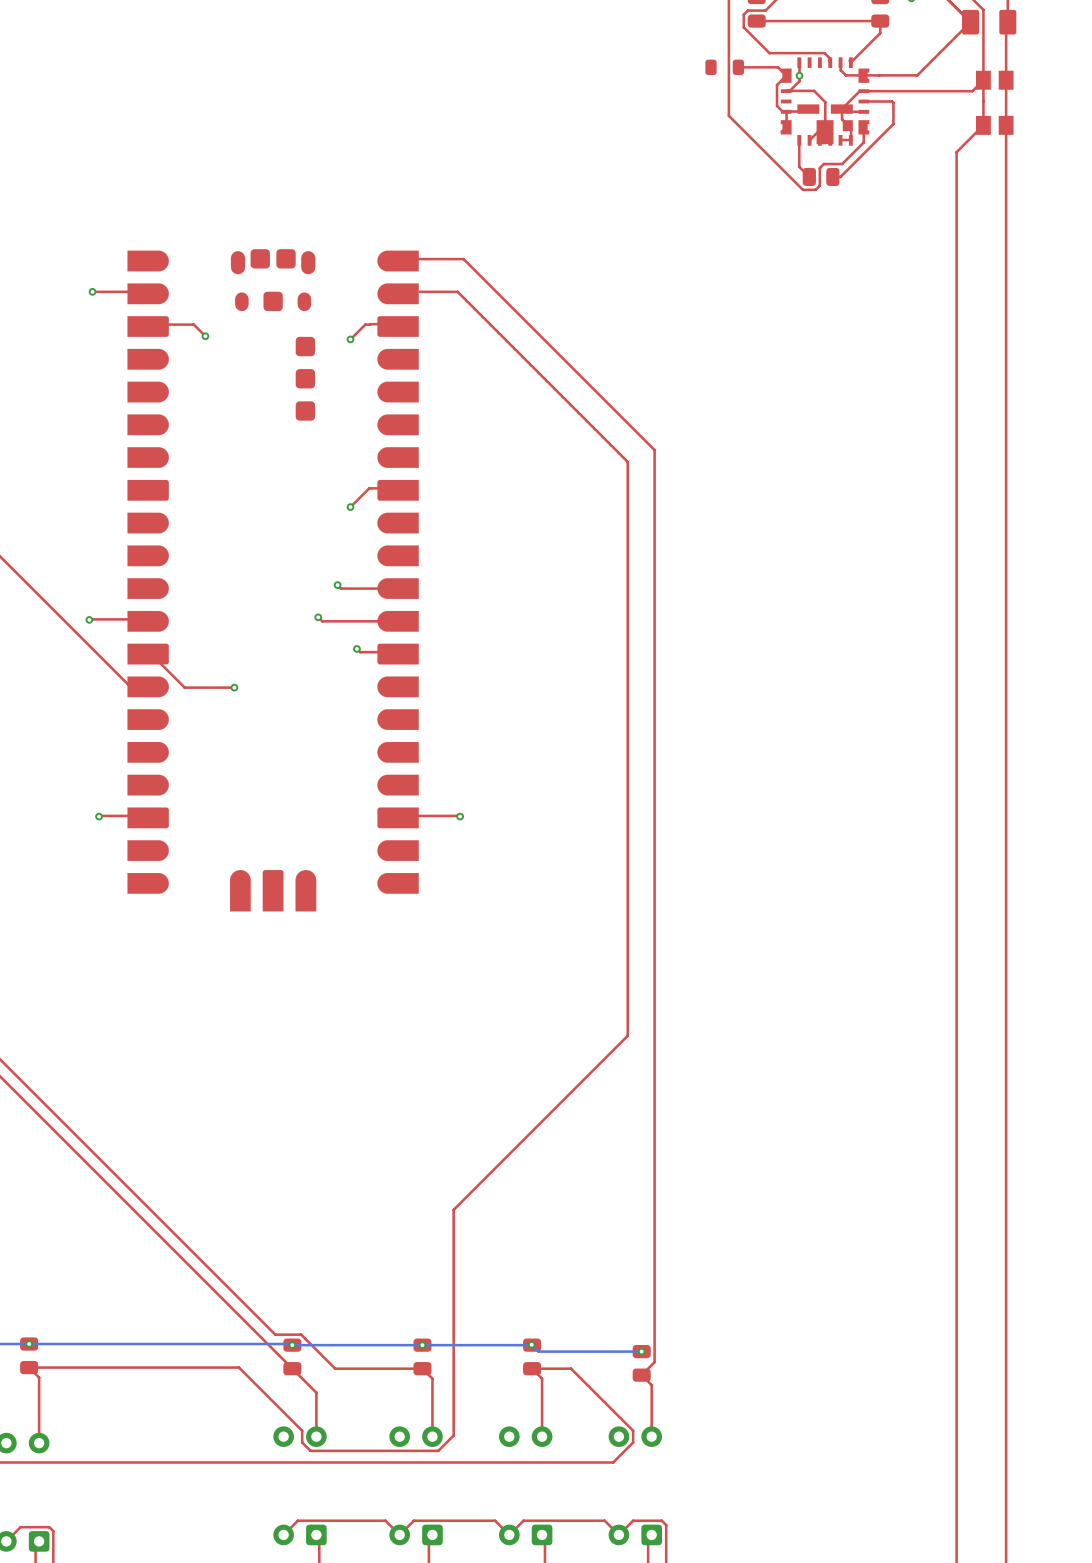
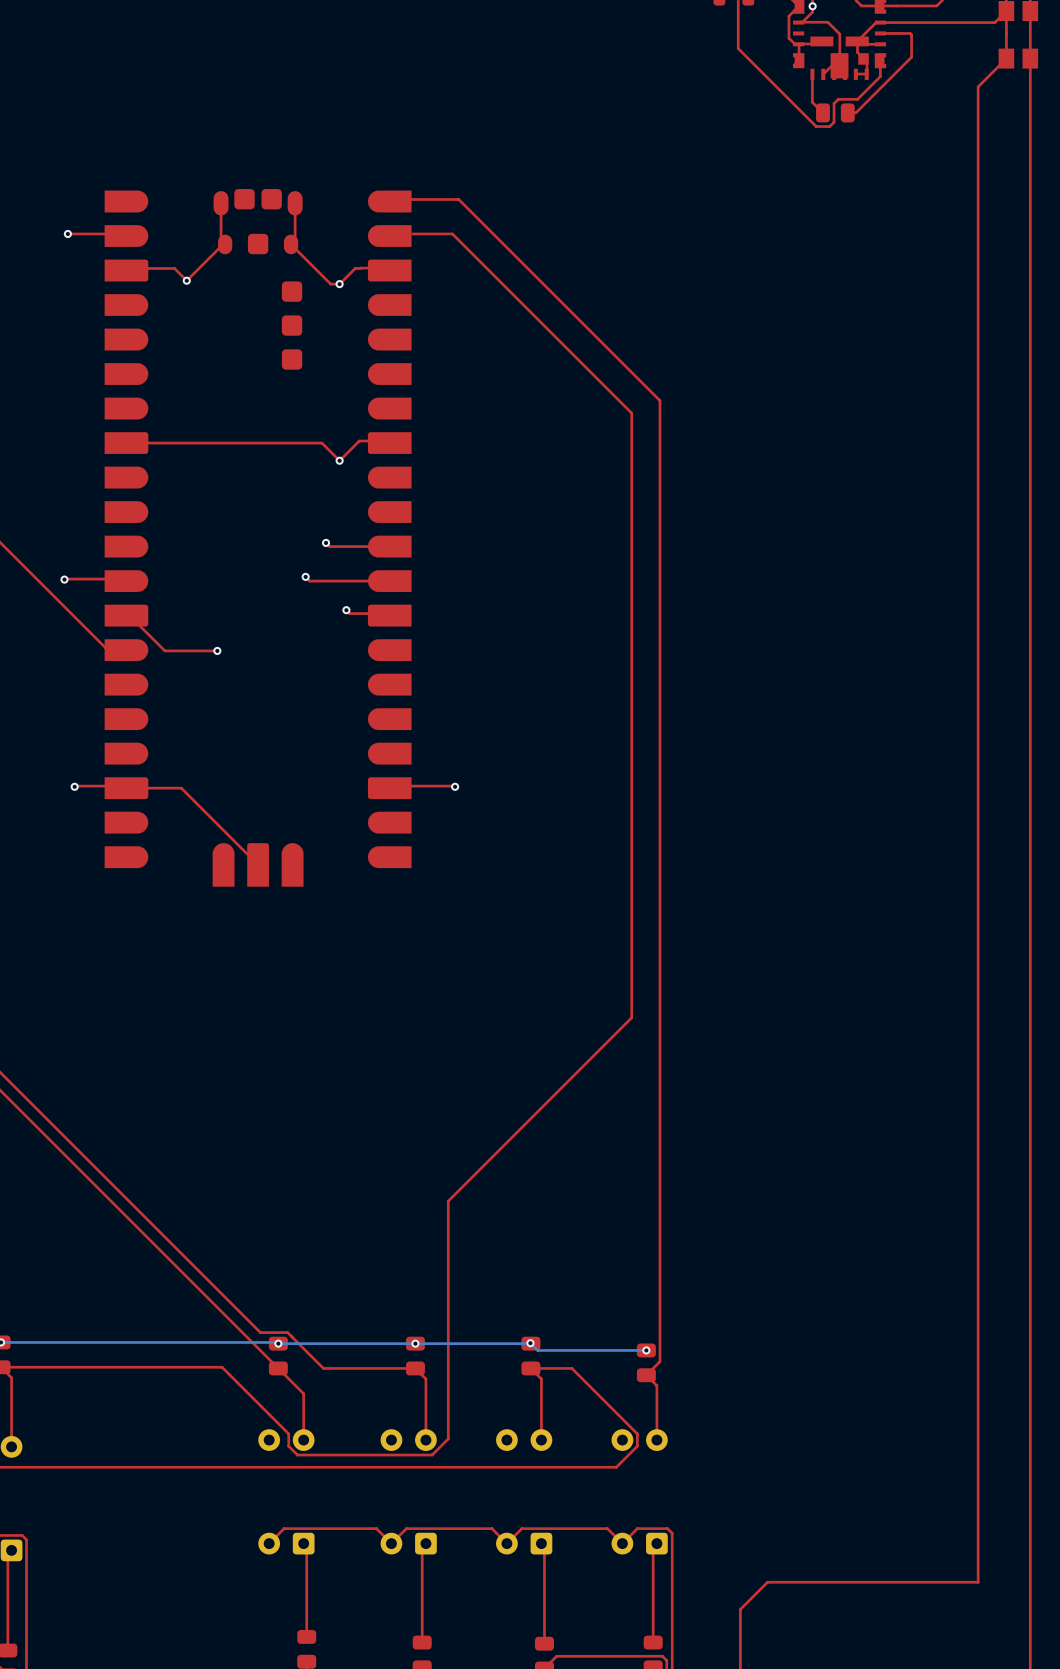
top track: none -> (221, 203) (221, 240) (225, 244) (186, 280)
top track: none -> (295, 203) (295, 240) (291, 244) (330, 284) (339, 284)
top track: none -> (126, 443) (321, 443) (339, 460)
top track: none -> (126, 788) (181, 788) (258, 864)

